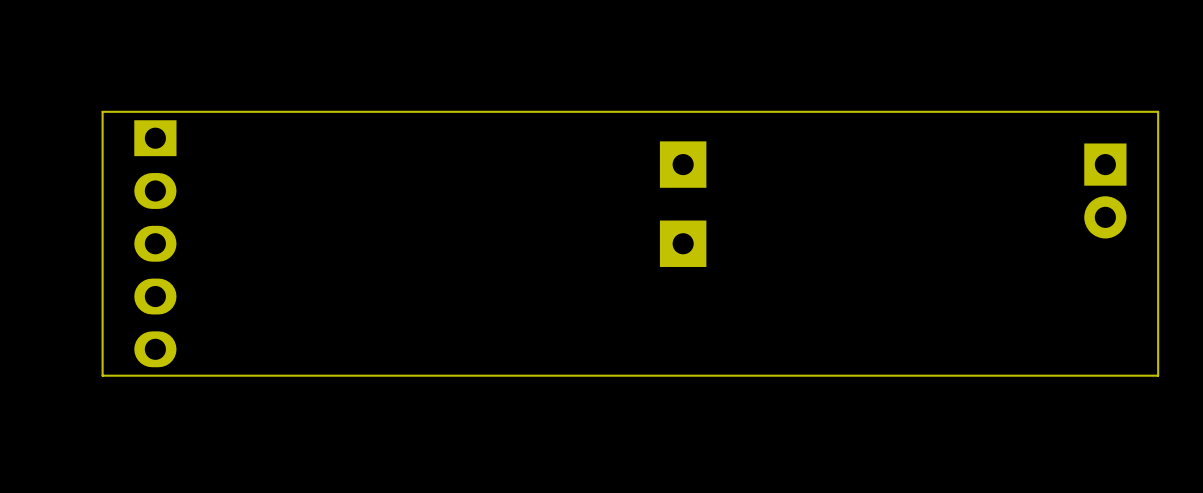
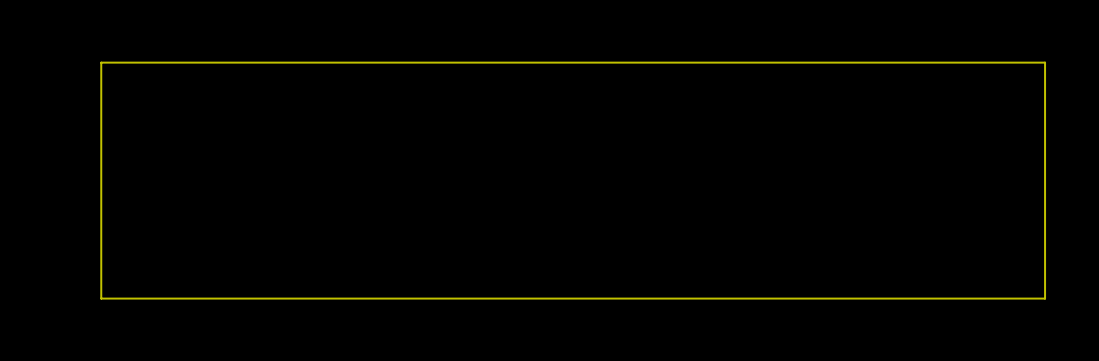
part: (683, 164) -> none
part: (1105, 190) -> none
part: (155, 243) -> none
part: (683, 243) -> none

